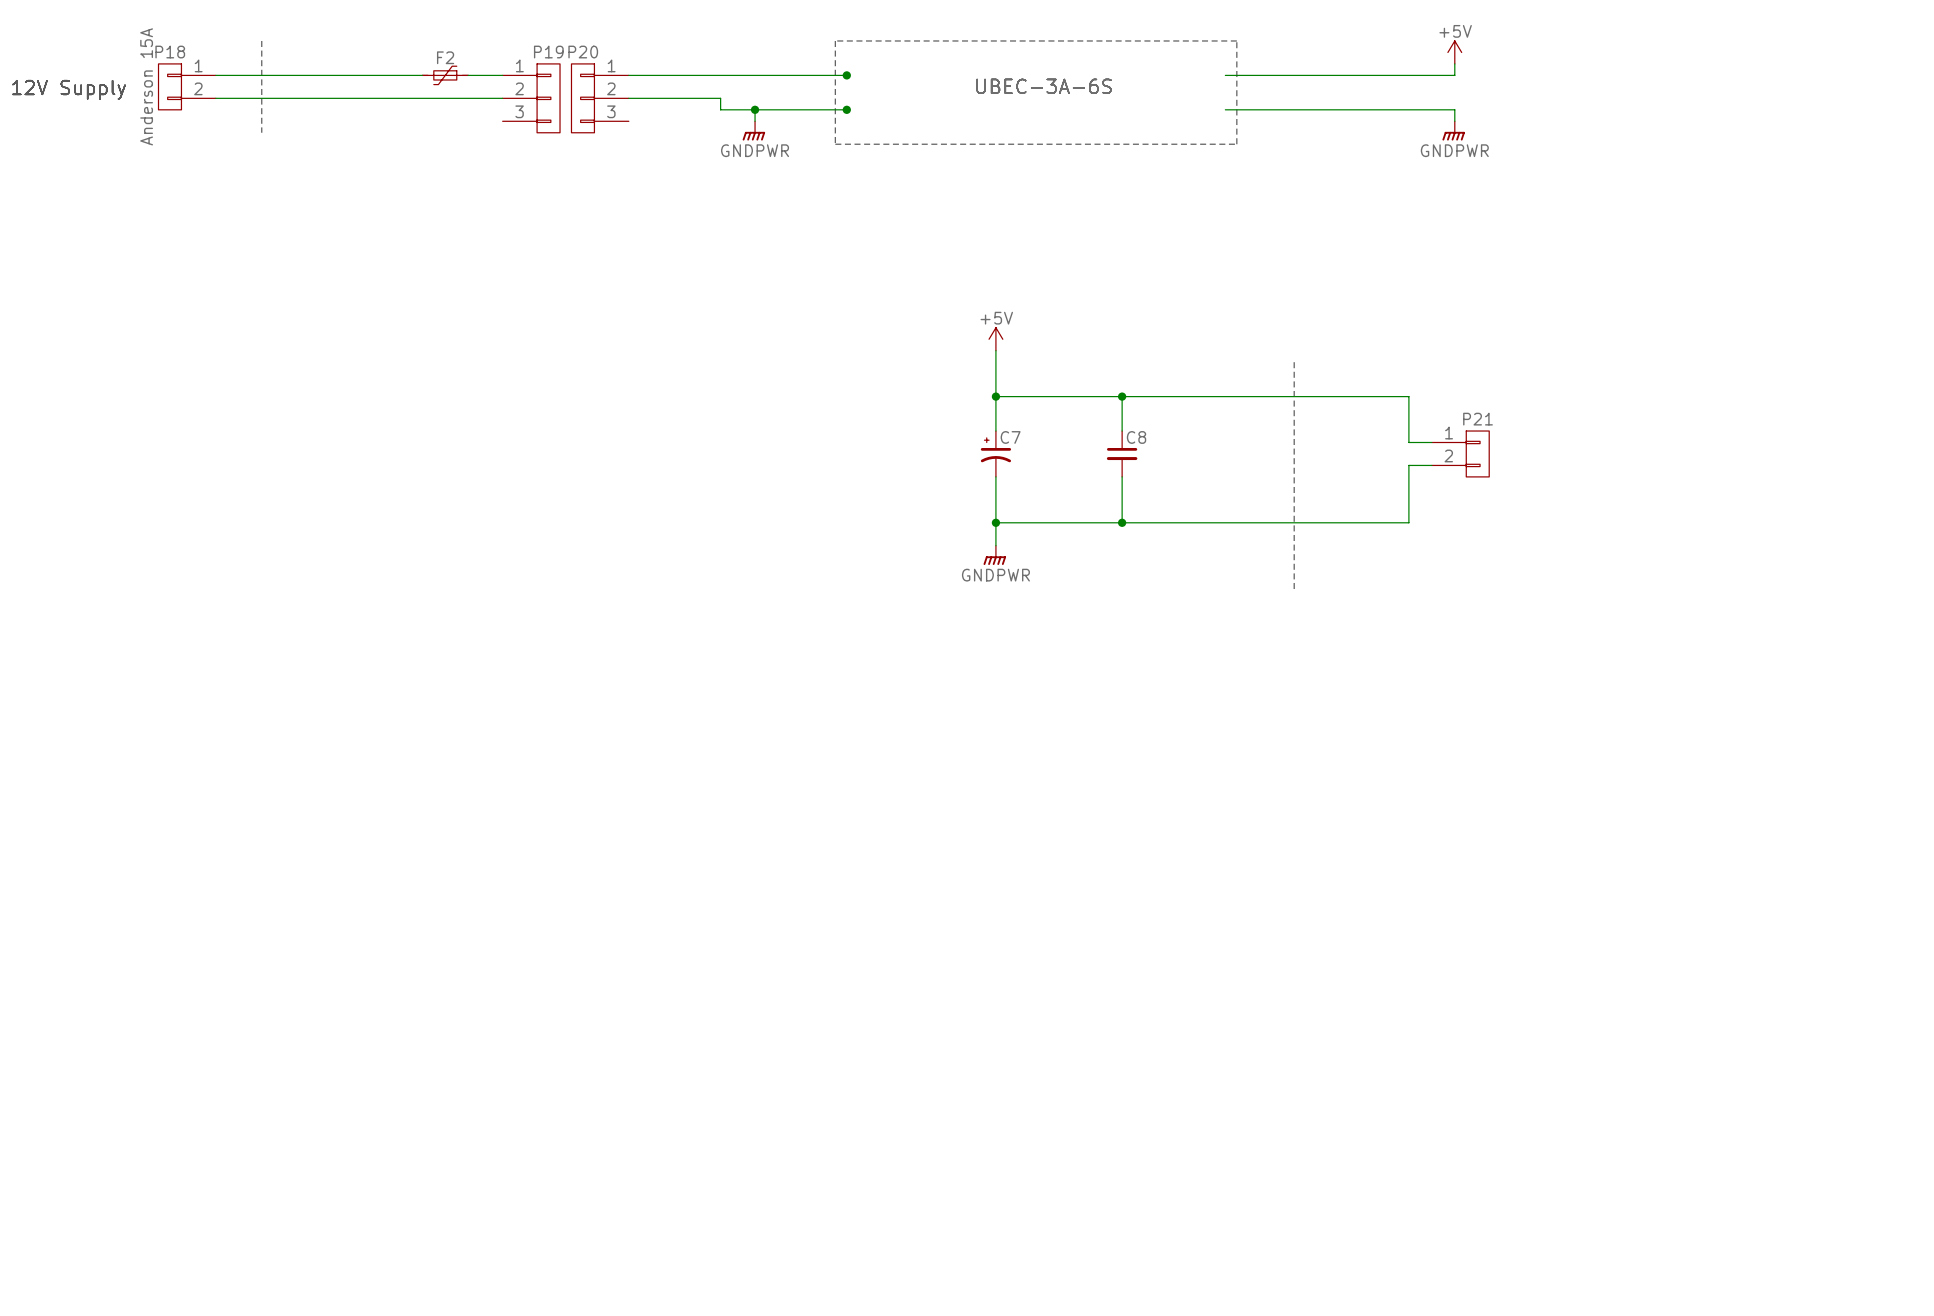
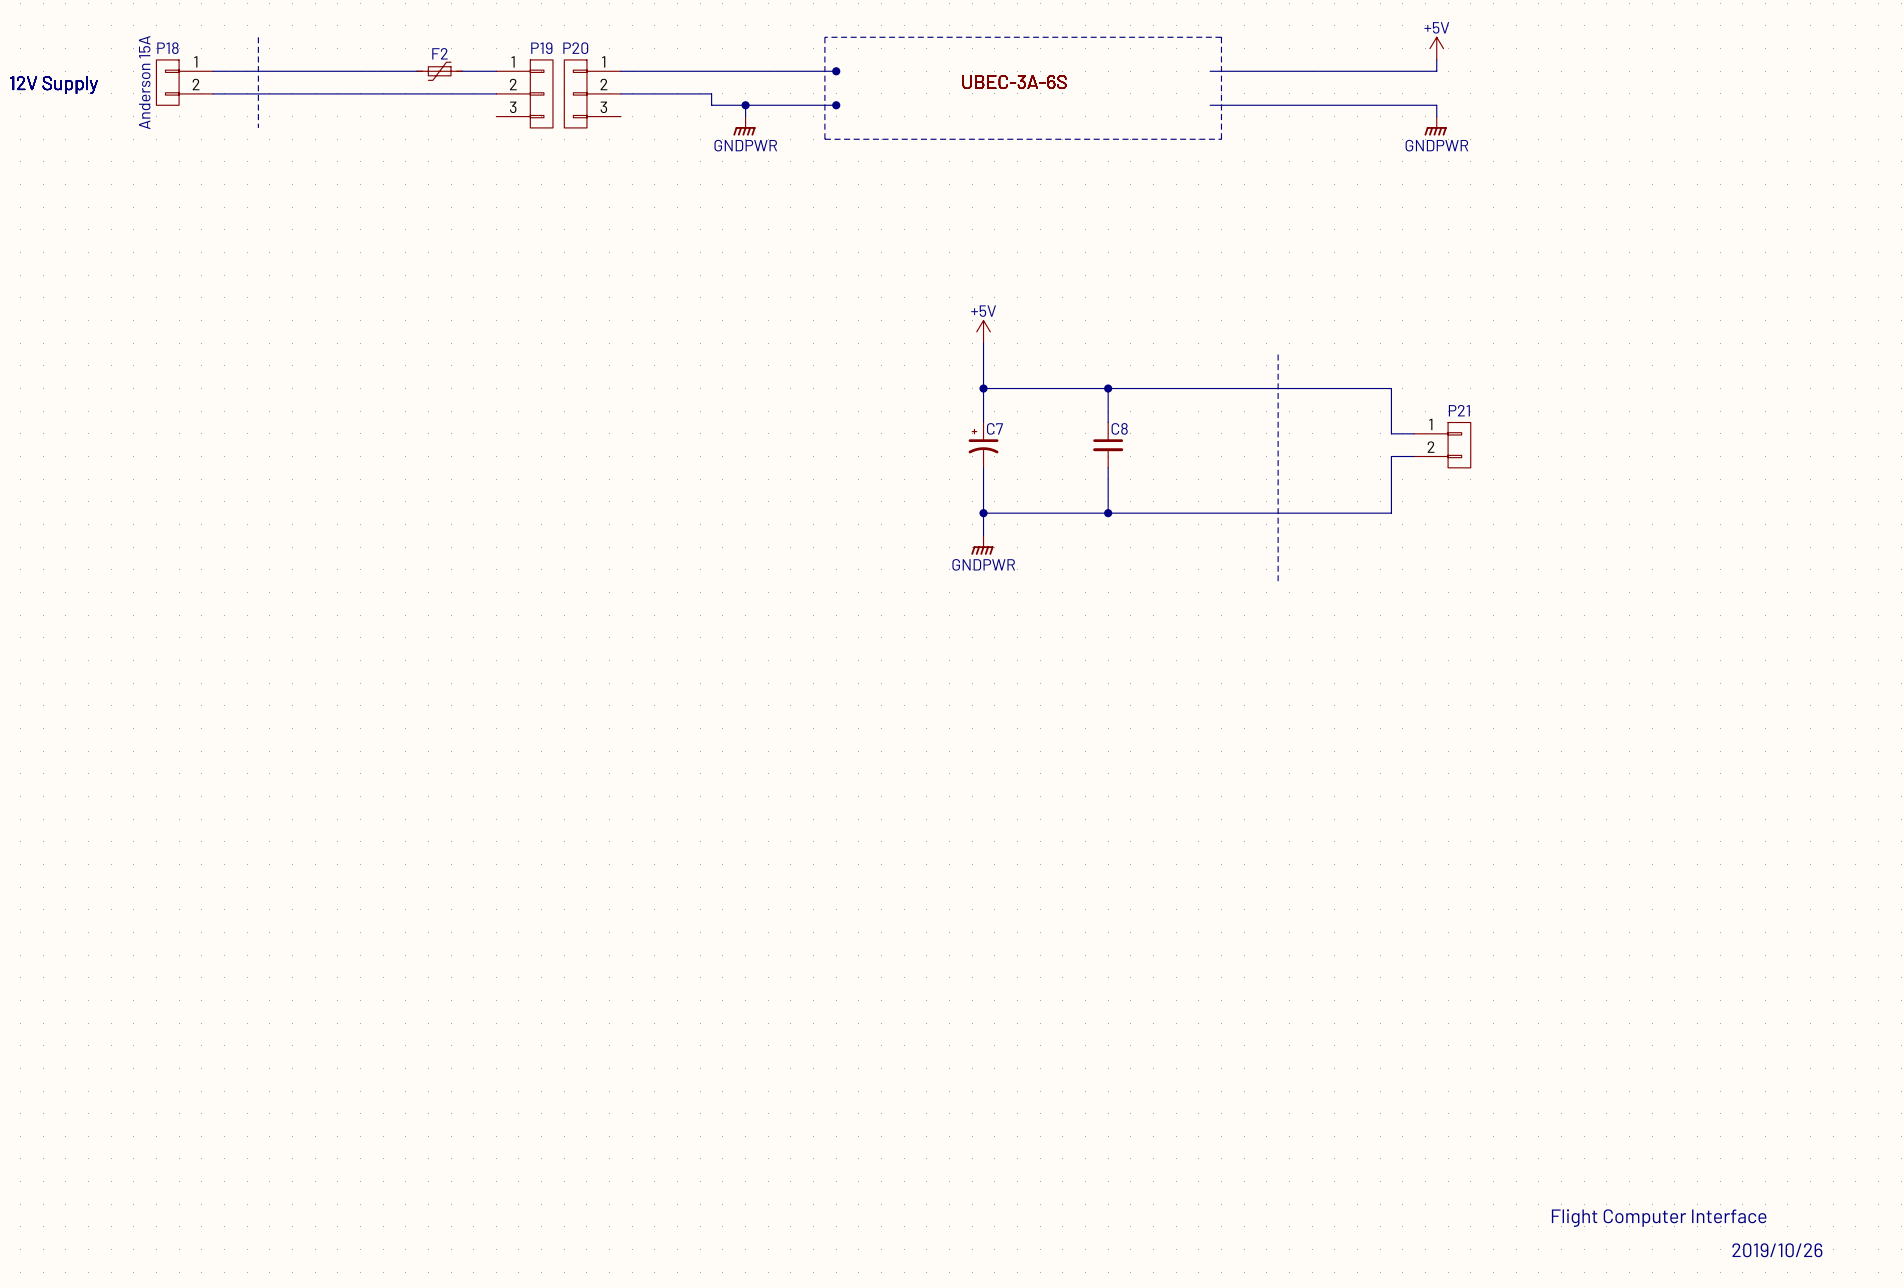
text: none -> Flight Computer Interface (1659, 1218)
text: none -> 2019/10/26 (1777, 1250)

